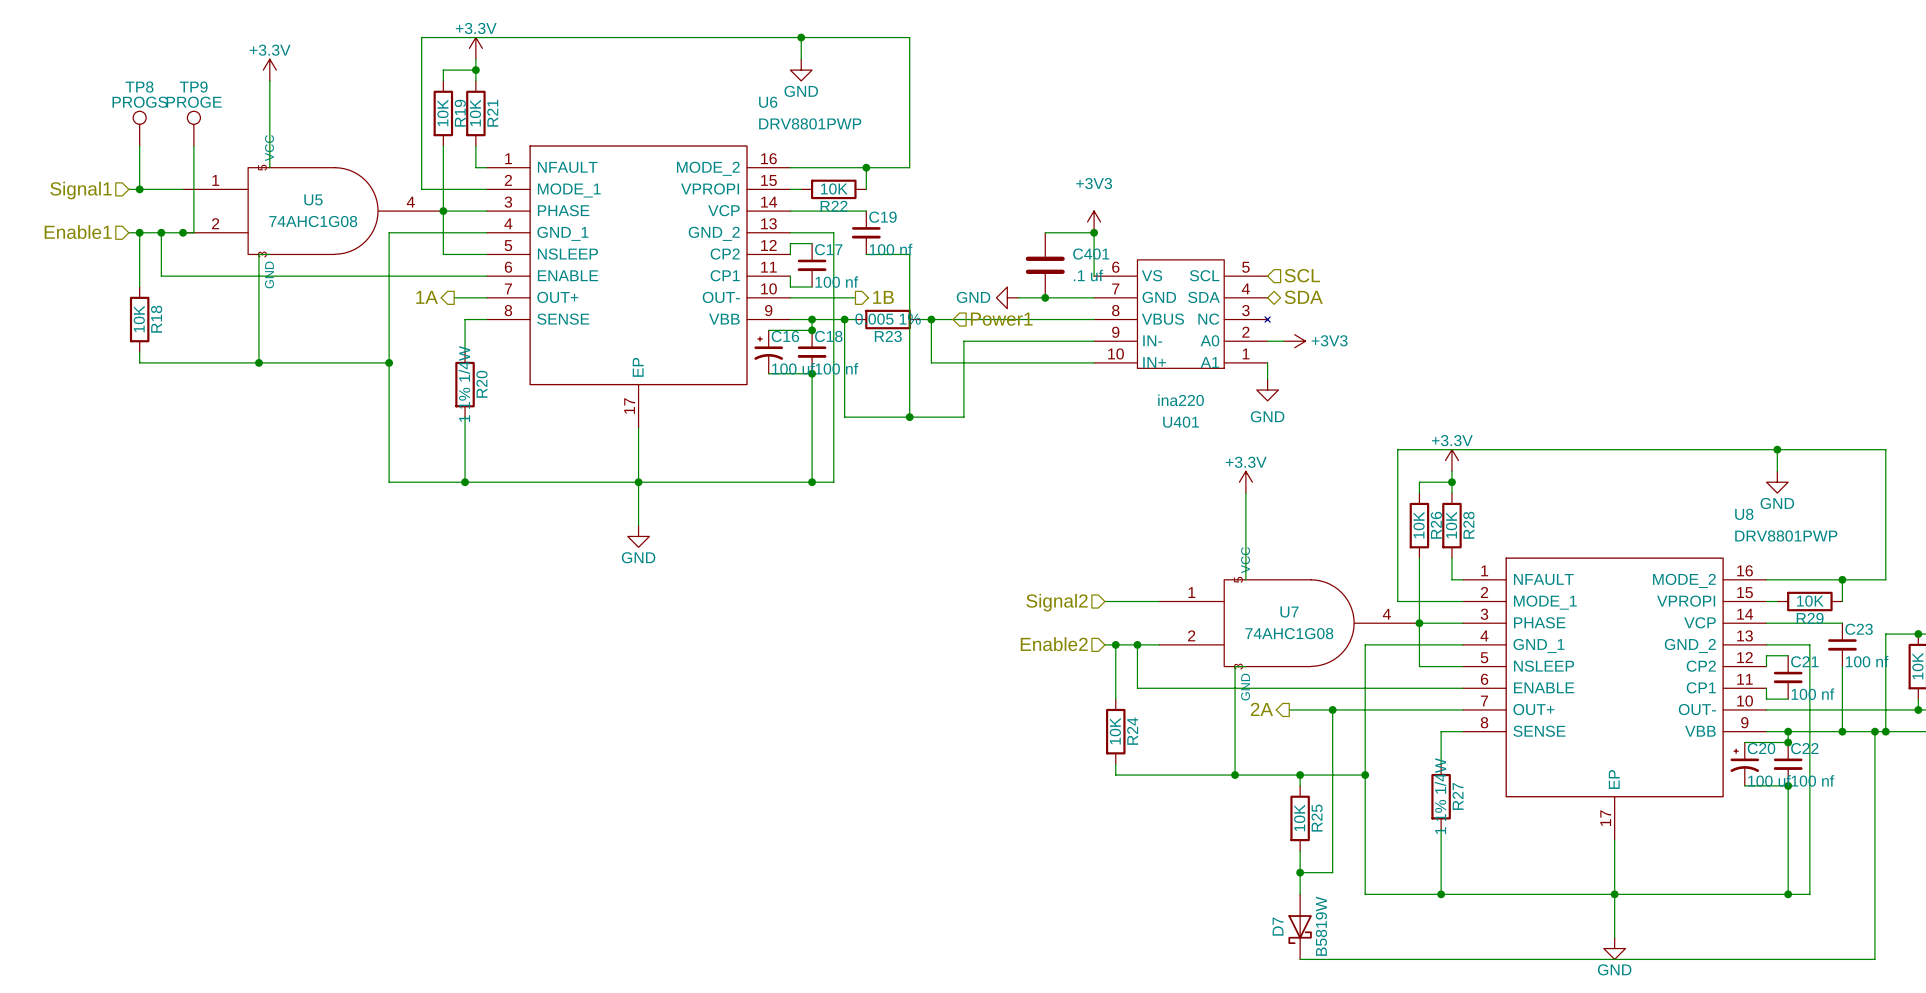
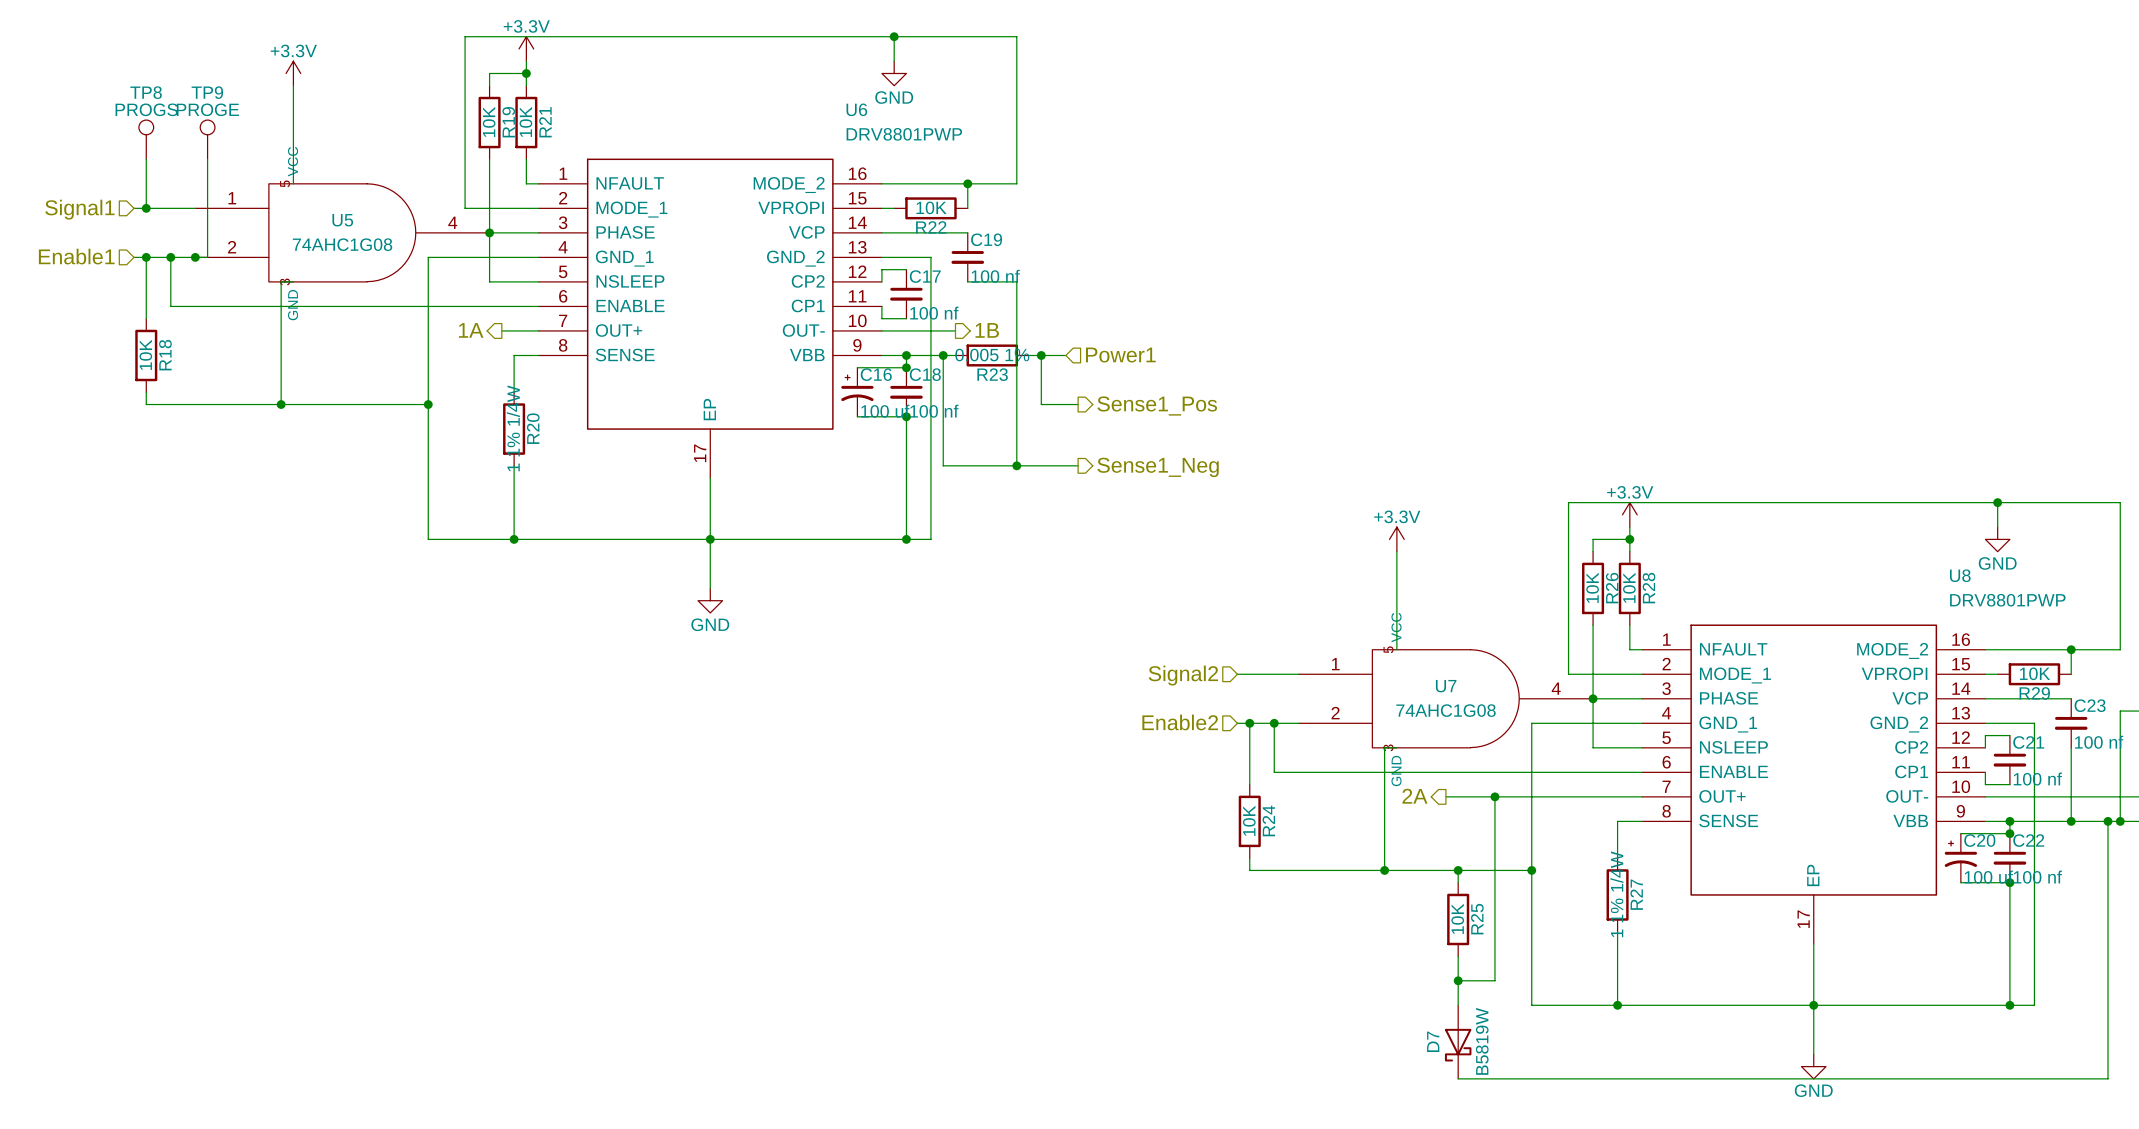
power symbol: +3V3 (1094, 221) -> none
wire: (1045, 232) (1094, 232) (1094, 276) -> none
junction: (1094, 232) -> none
C401: .1 uf (1045, 265) -> none
hierarchical label: SCL (1302, 275) -> none
power symbol: GND (1007, 297) -> none
wire: (1018, 297) (1094, 297) -> none
junction: (1045, 297) -> none
hierarchical label: SDA (1303, 297) -> none
U401: ina220 (1182, 314) -> none
wire: (953, 319) (1094, 319) -> none
wire: (1094, 341) (963, 341) (963, 417) -> none
wire: (1267, 341) (1283, 341) -> none
power symbol: +3V3 (1294, 341) -> none
wire: (963, 362) (1094, 362) -> none
wire: (1267, 362) (1267, 379) -> none
hierarchical label: none -> Sense1_Pos (1157, 405)
power symbol: GND (1267, 390) -> none
hierarchical label: none -> Sense1_Neg (1158, 467)

